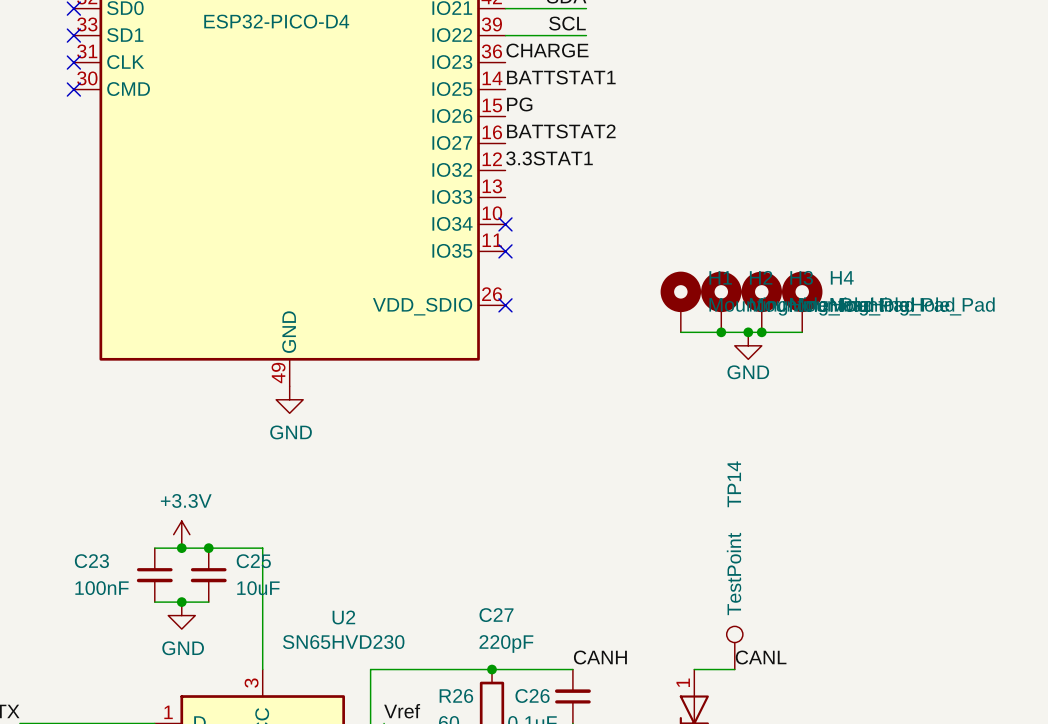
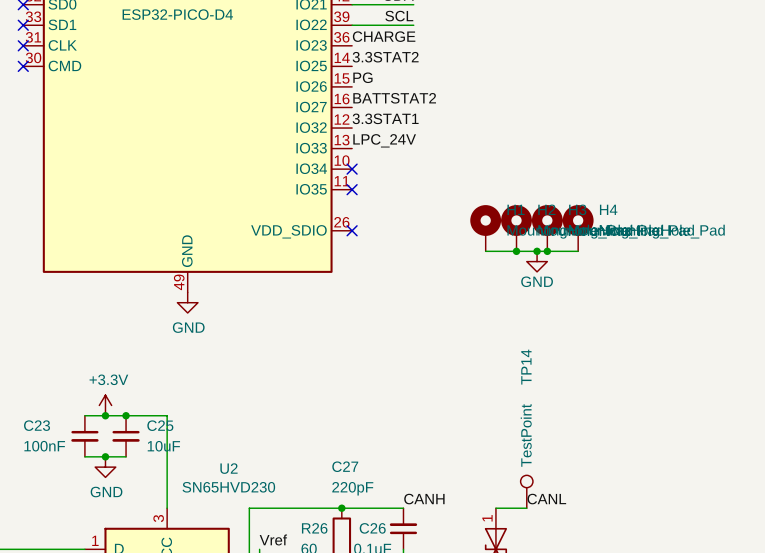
label: BATTSTAT1 (561, 77) -> 3.3STAT2 (385, 57)
label: none -> LPC_24V (384, 140)

